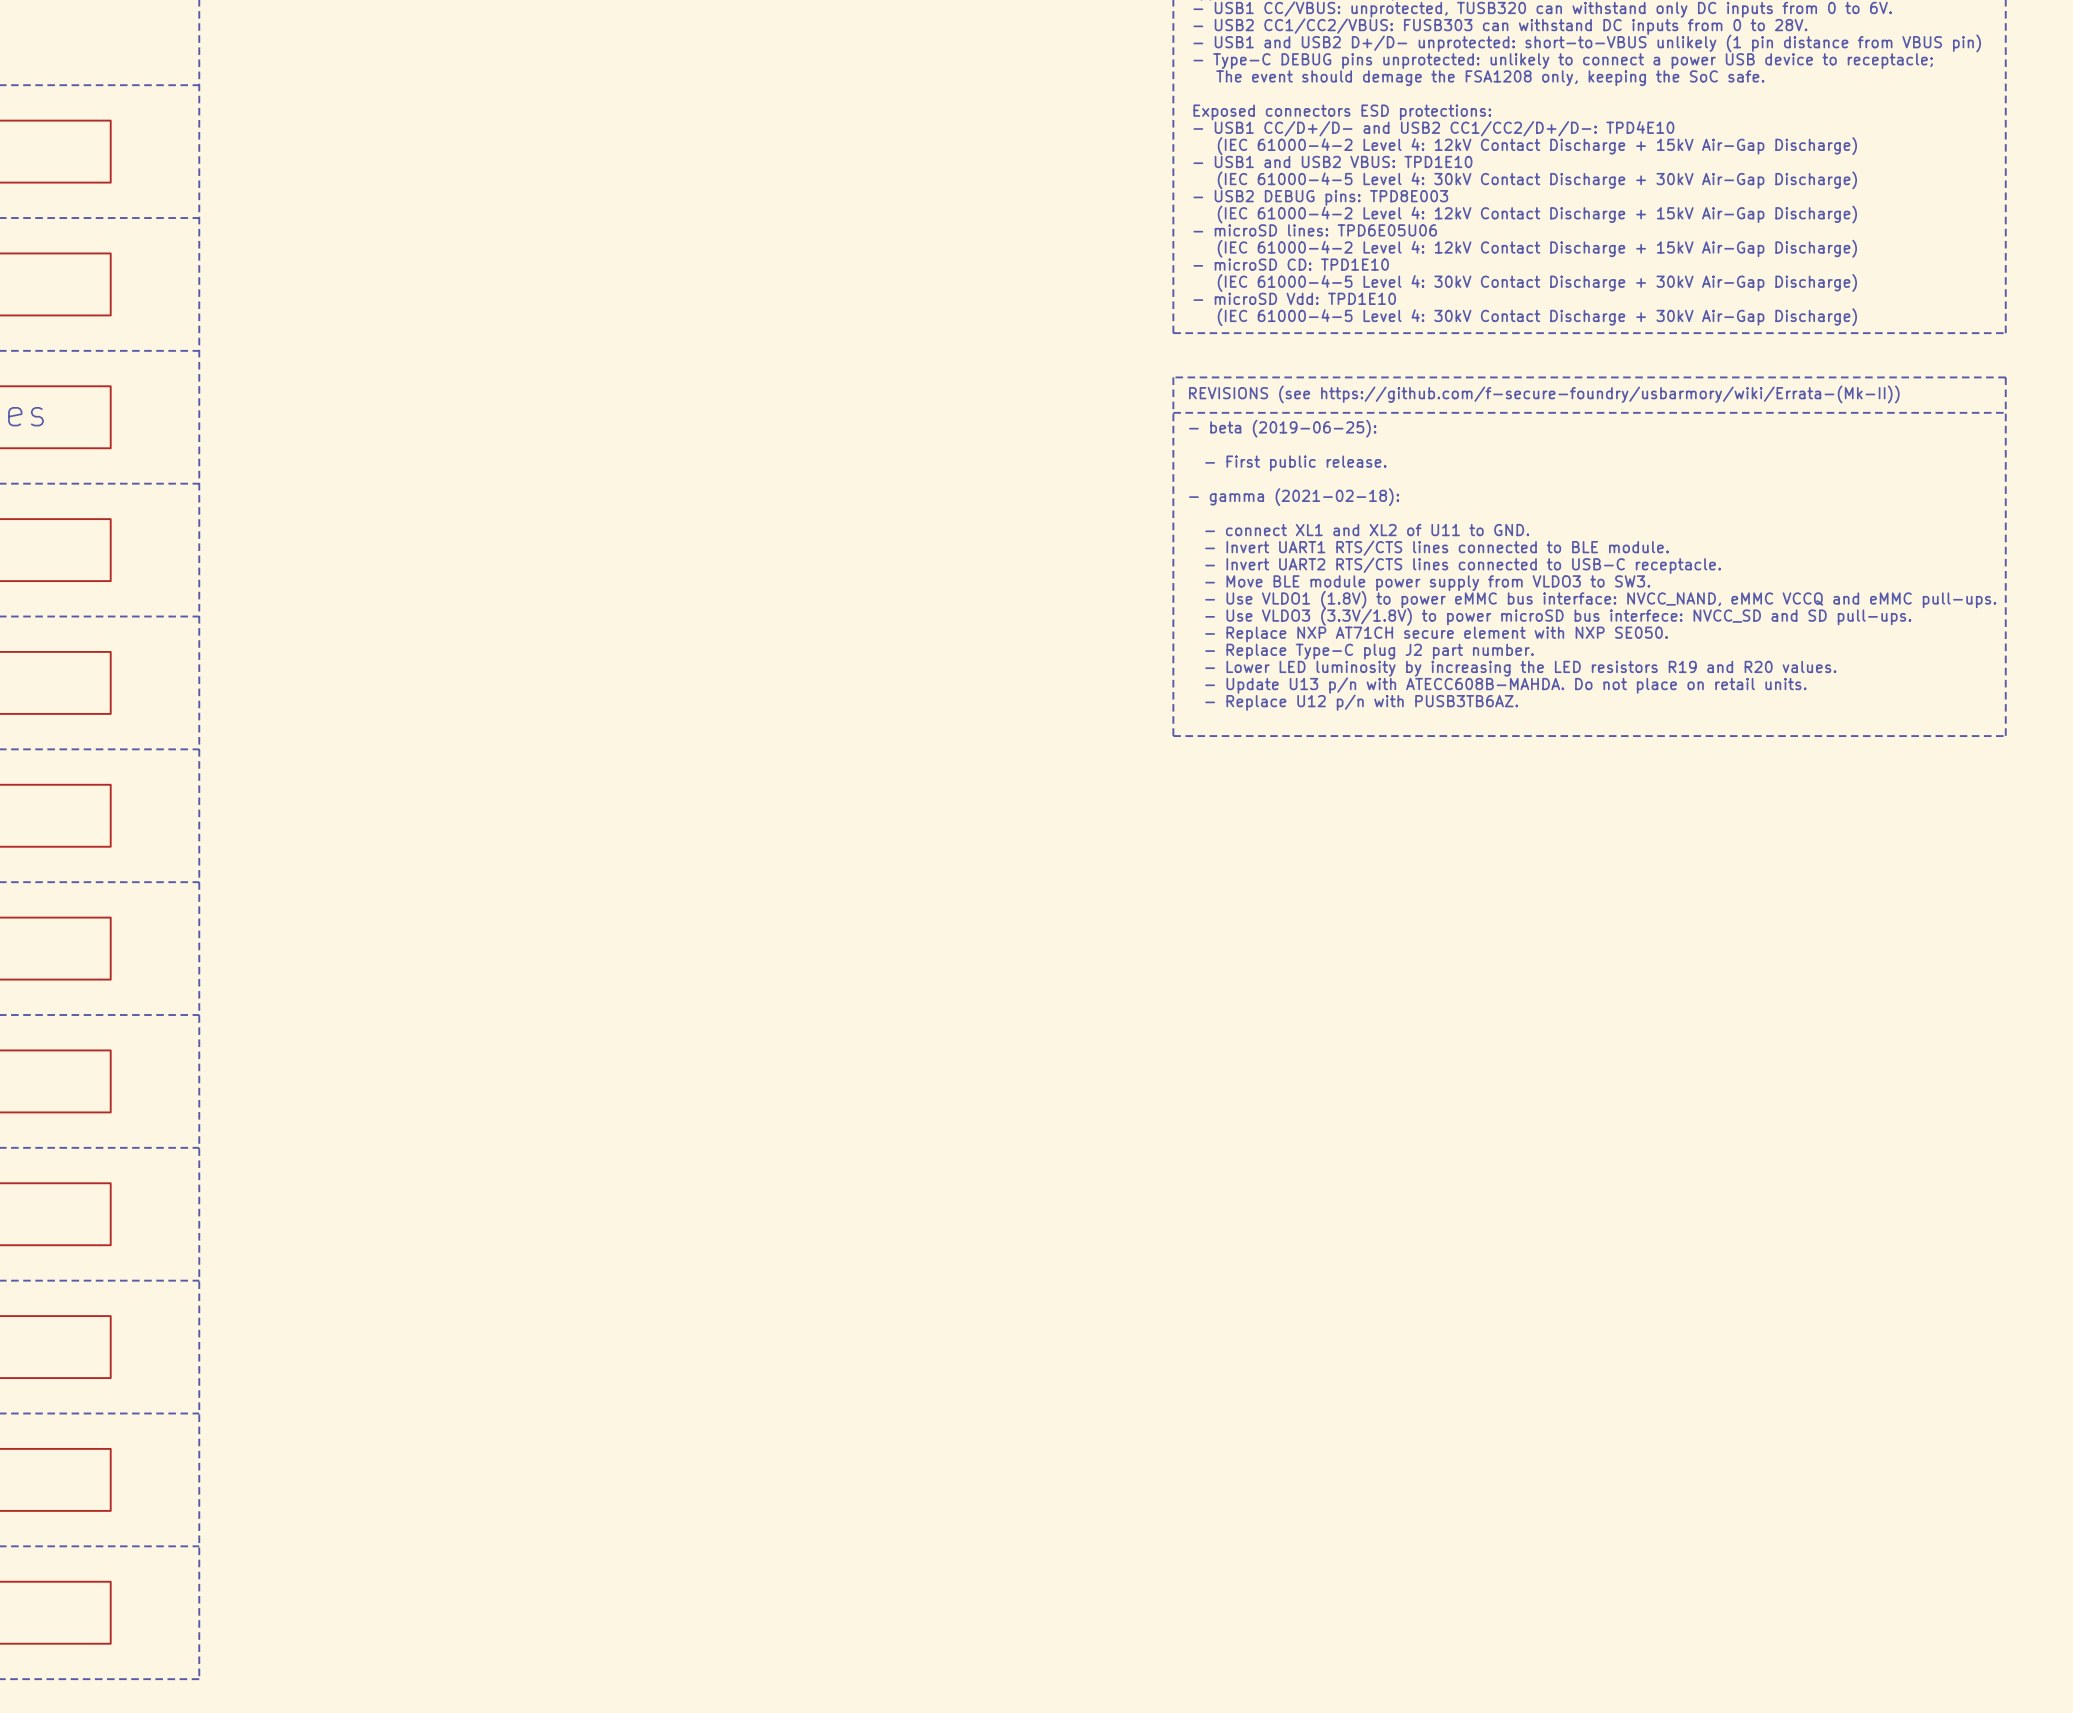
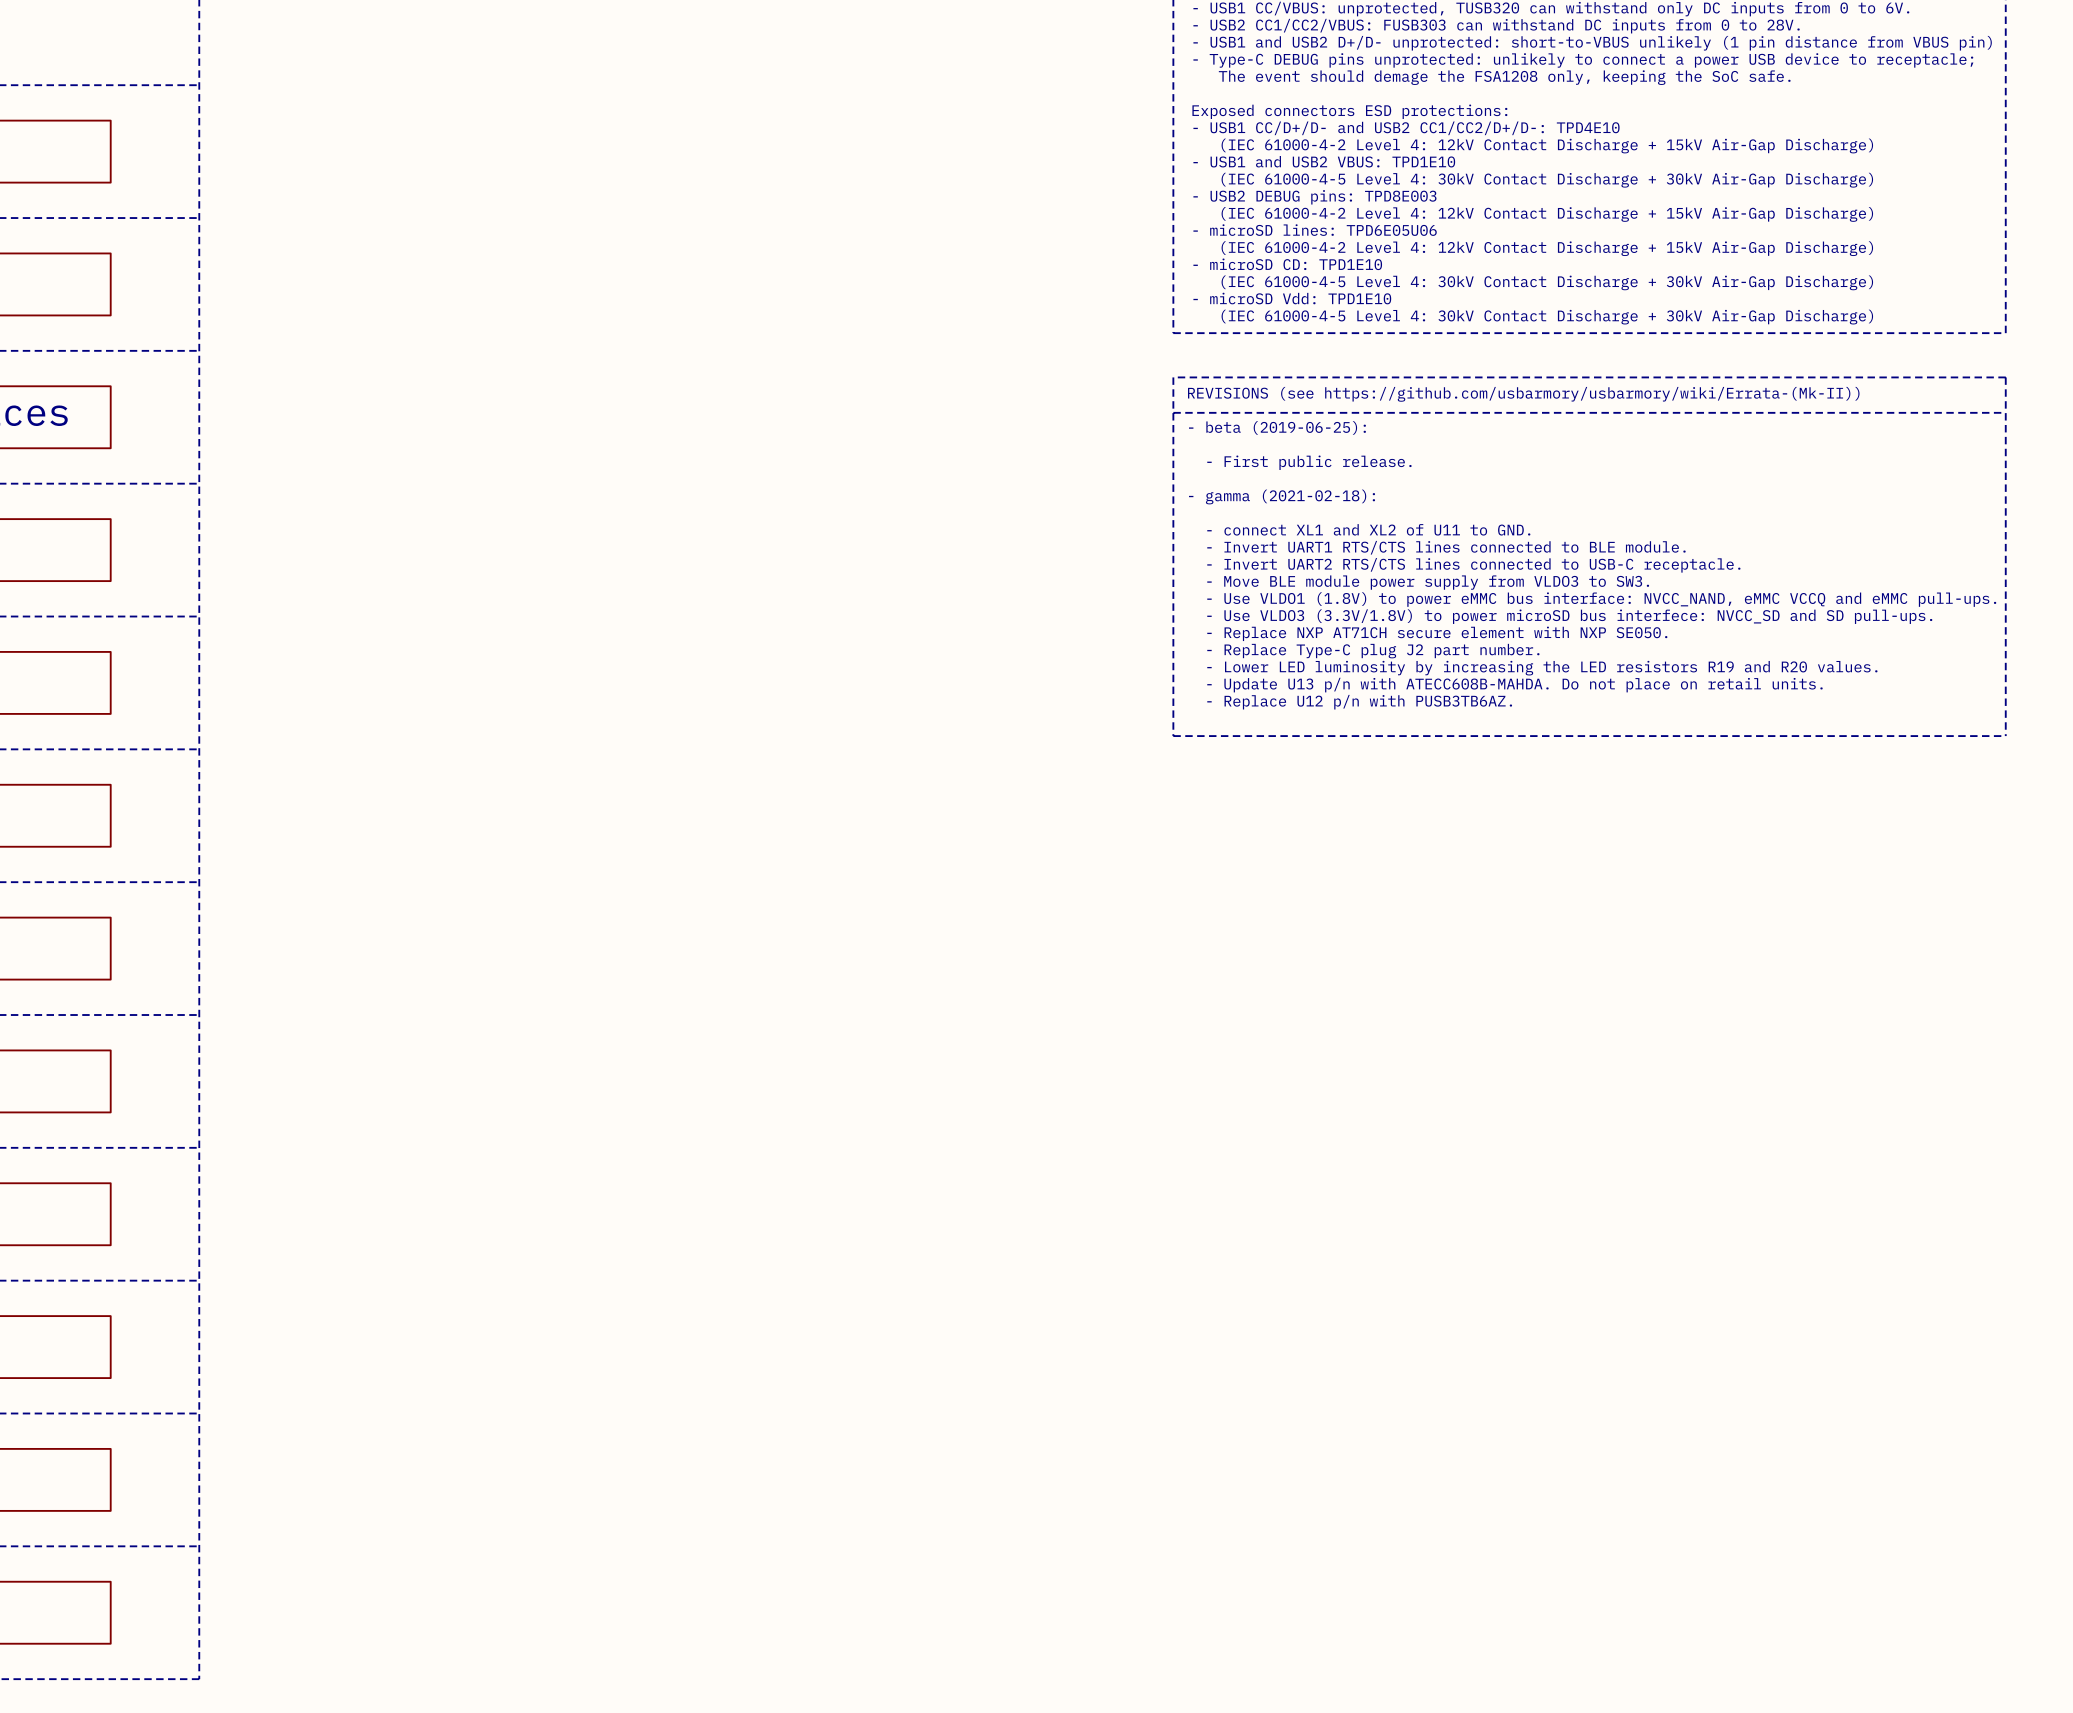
text: REVISIONS (see https://github.com/f-secure-foundry/usbarmory/wiki/Errata-(Mk-II)) (1544, 394) -> REVISIONS (see https://github.com/usbarmory/usbarmory/wiki/Errata-(Mk-II)) (1523, 394)

